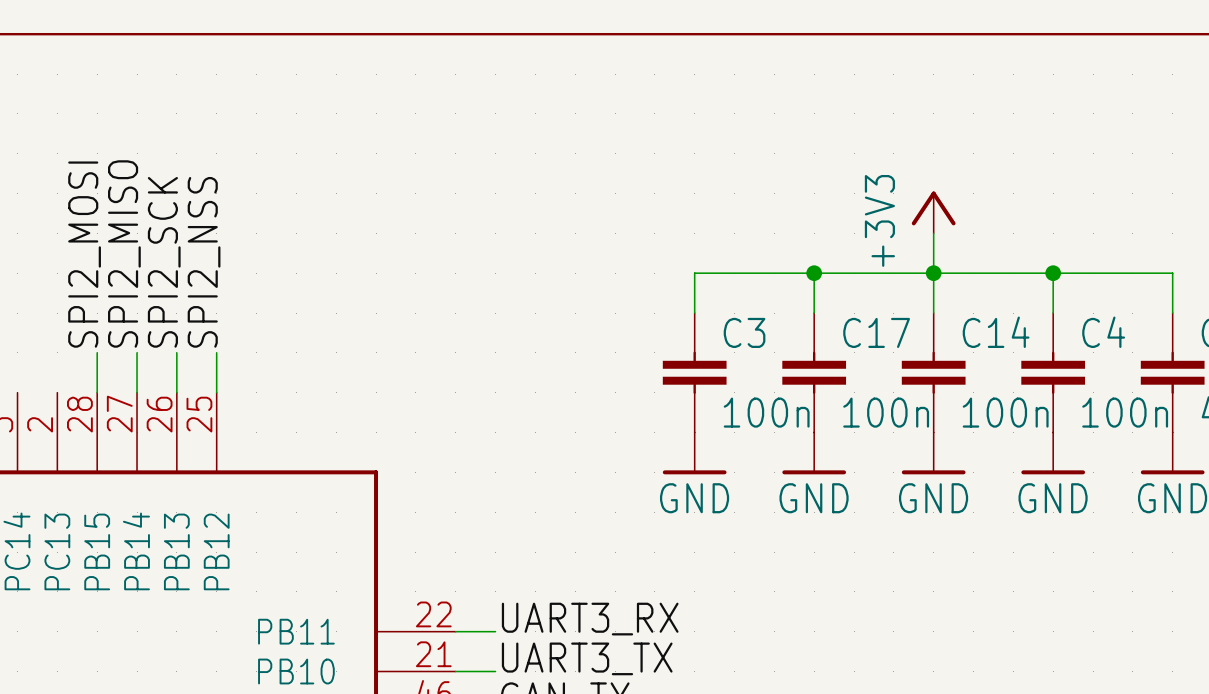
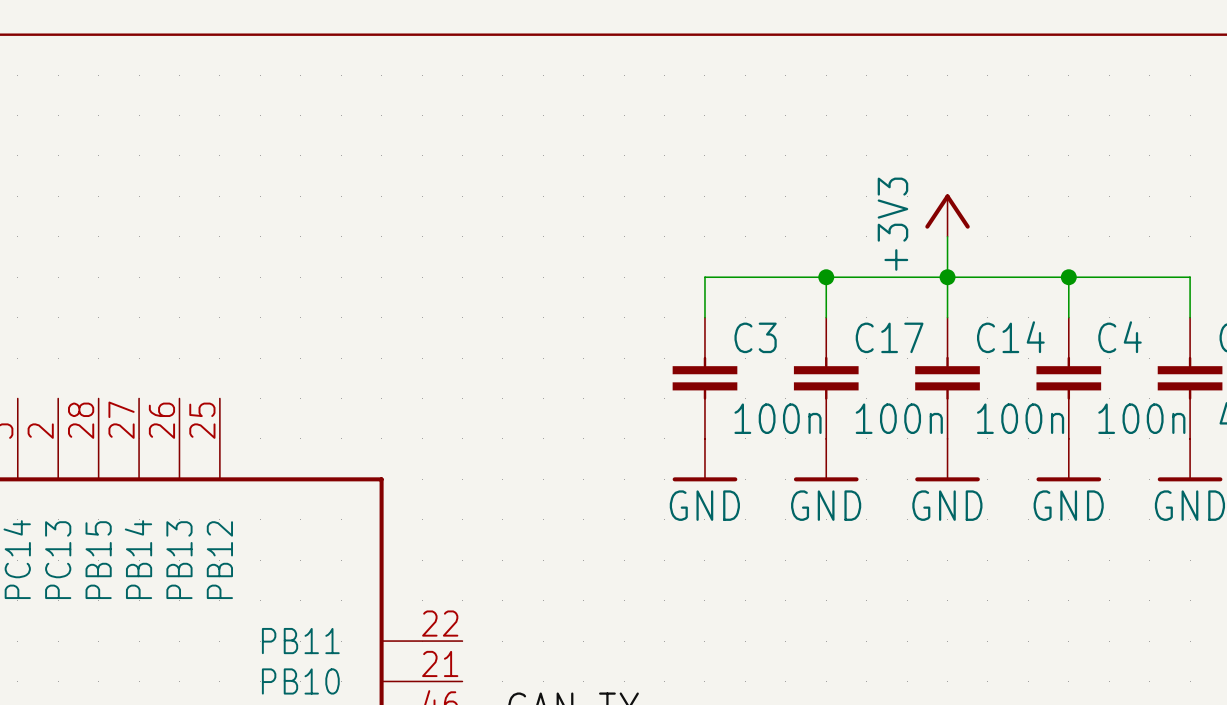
label: SPI2_MISO (124, 253) -> none
label: SPI2_MOSI (84, 254) -> none
label: SPI2_SCK (164, 262) -> none
label: SPI2_NSS (204, 262) -> none
wire: (97, 352) (97, 392) -> none
wire: (137, 352) (137, 392) -> none
wire: (176, 352) (176, 392) -> none
wire: (216, 352) (216, 392) -> none
label: UART3_RX (590, 619) -> none
wire: (455, 631) (495, 631) -> none
label: UART3_TX (587, 658) -> none
wire: (455, 671) (495, 671) -> none

